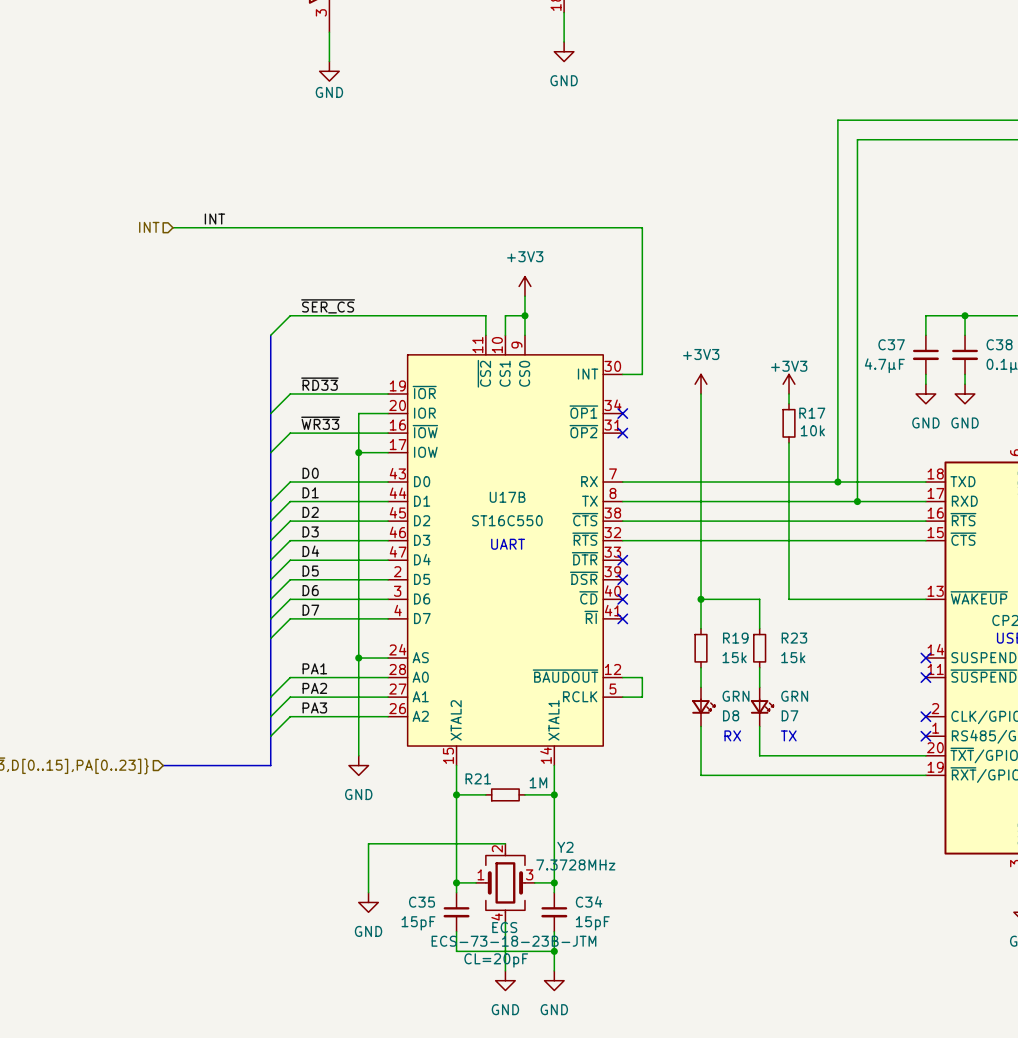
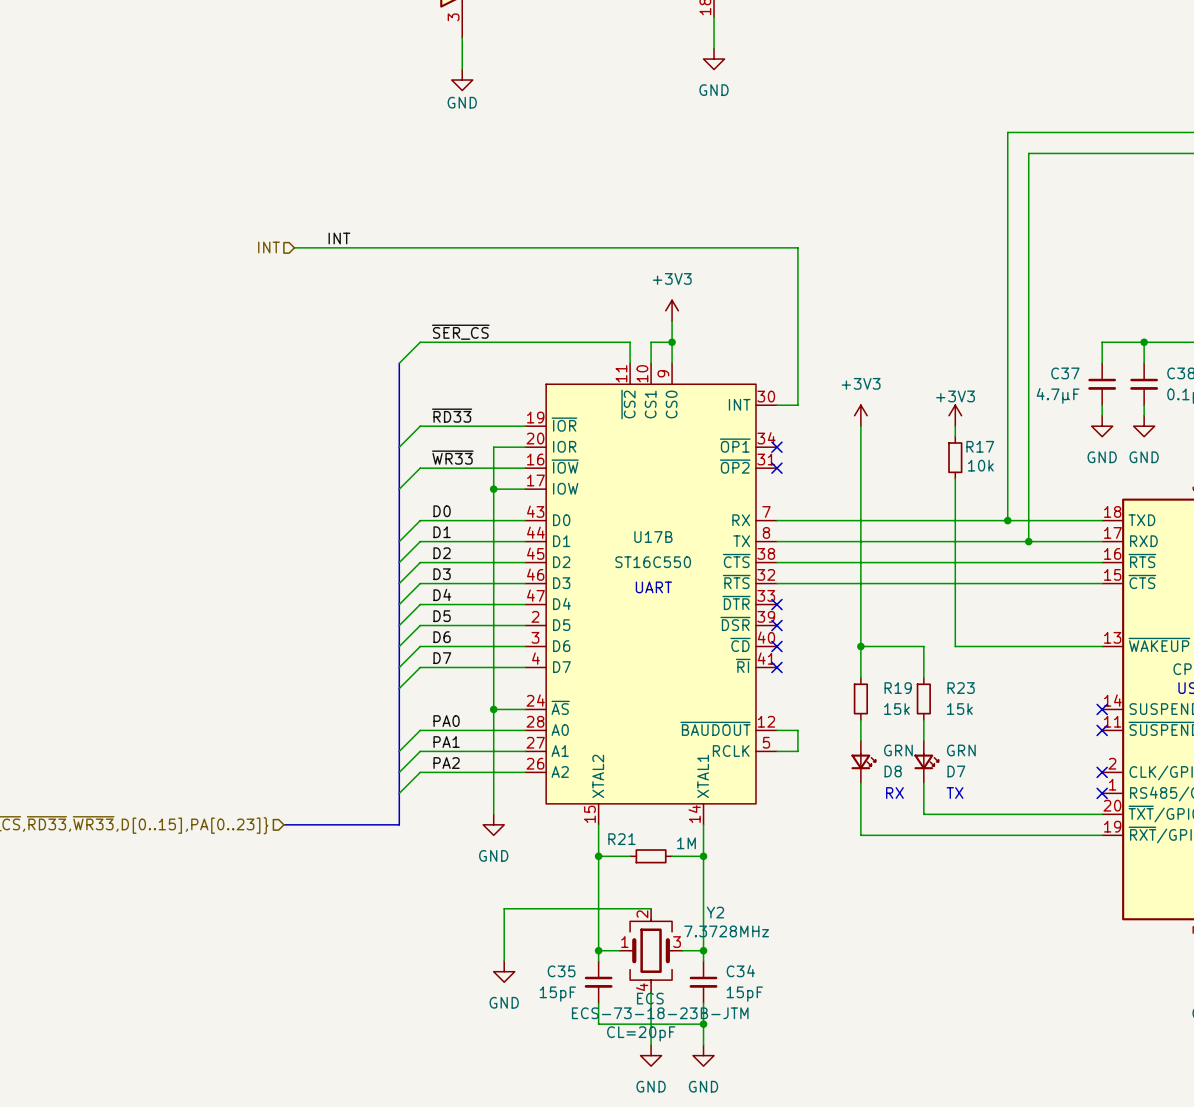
U17B pin name: AS (420, 657) -> ~{AS} (560, 707)
label: PA1 (314, 668) -> PA0 (446, 721)
label: PA2 (314, 688) -> PA1 (446, 742)
label: PA3 (314, 707) -> PA2 (446, 763)

